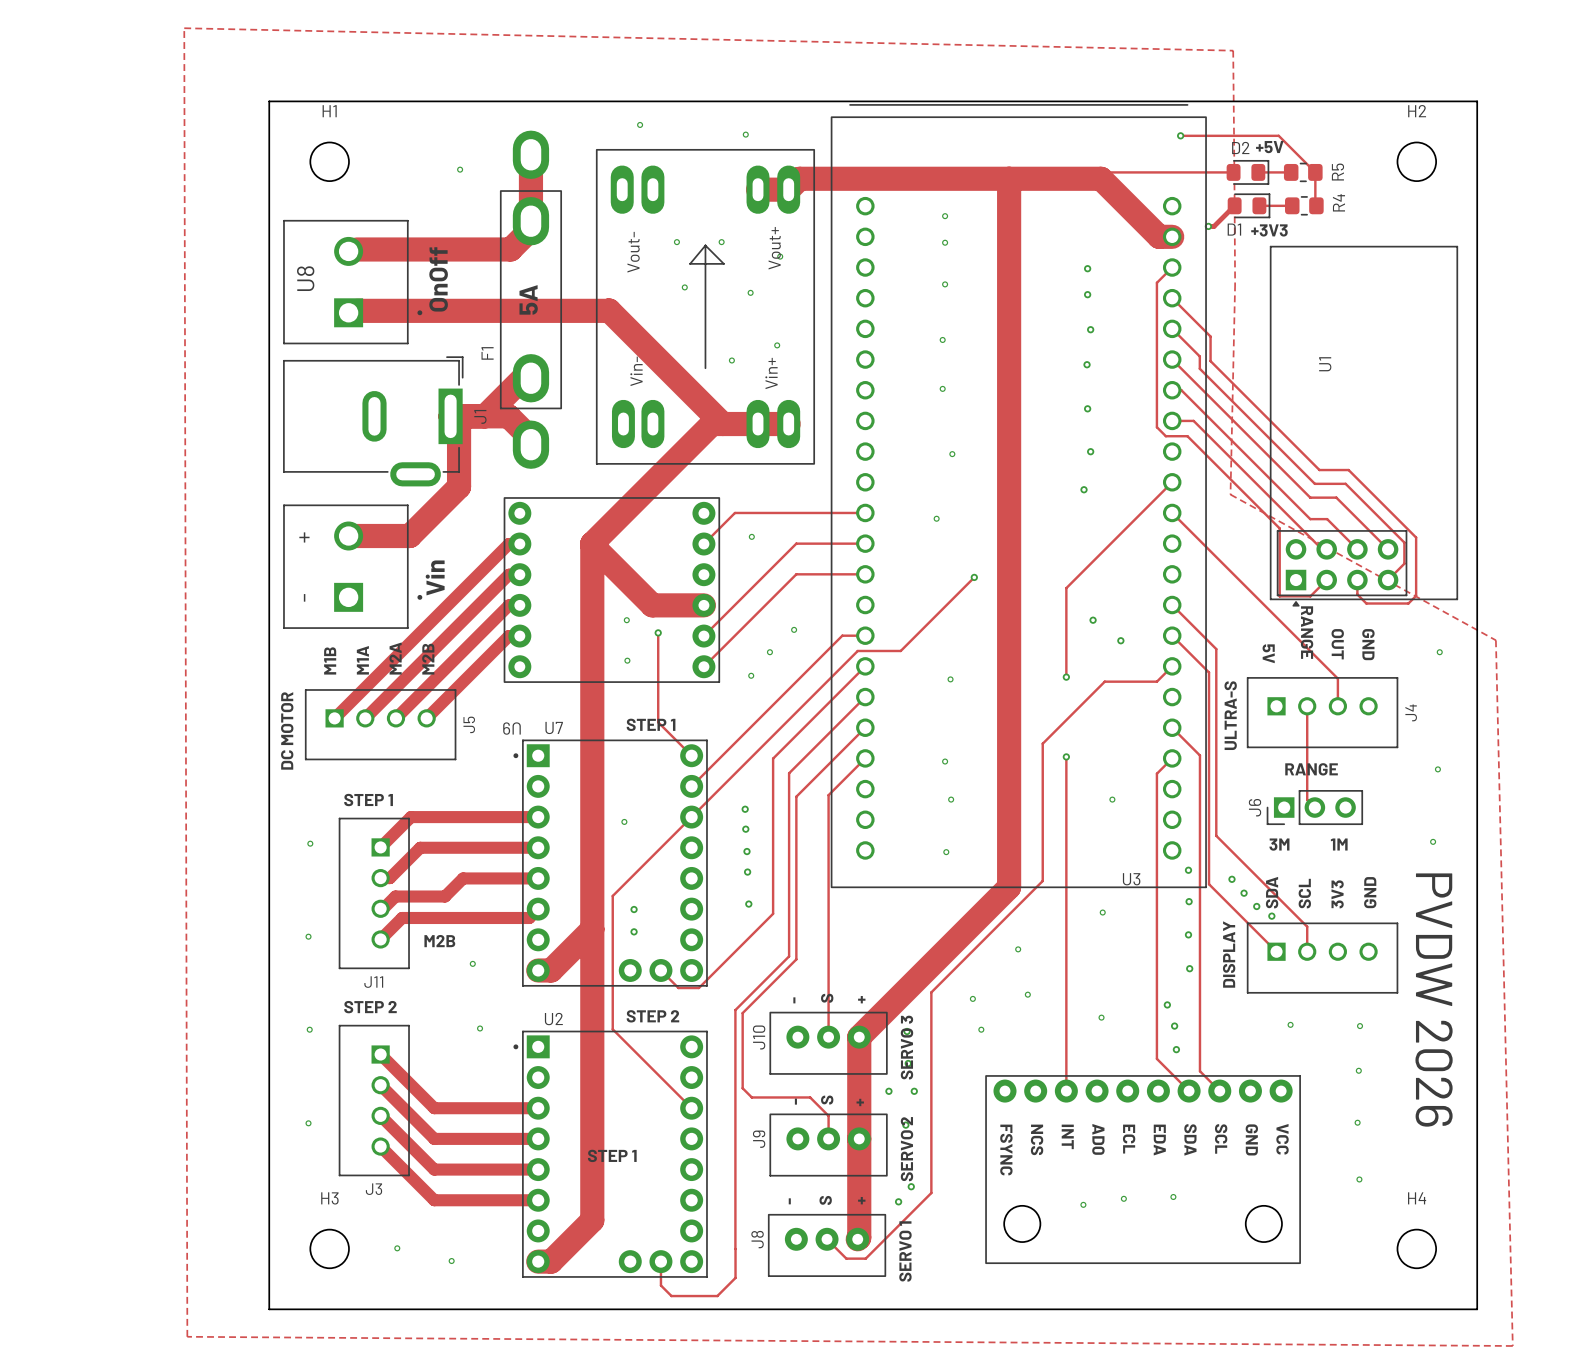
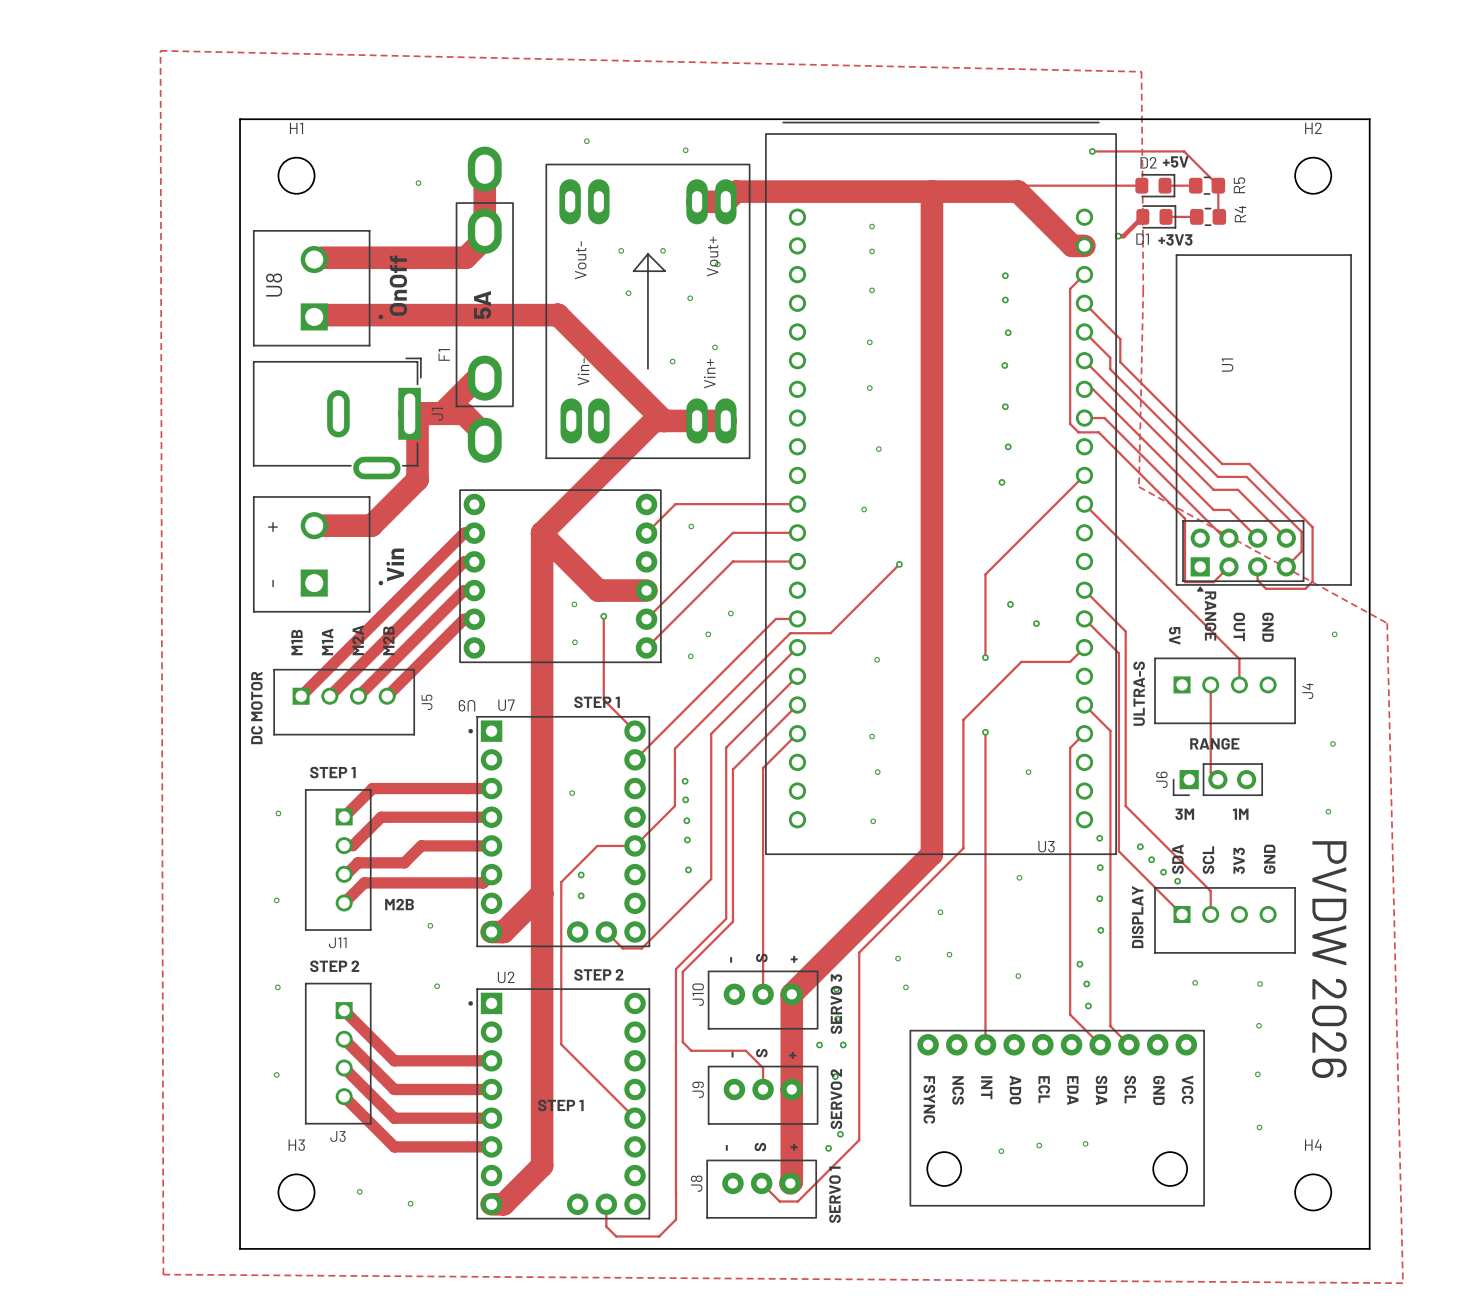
track: (734, 774) (612, 895) (612, 917) -> (674, 748) (674, 806) (635, 845) (597, 845) (561, 882)
track: (612, 1029) (691, 1108) -> (561, 987) (561, 1044) (635, 1118)

